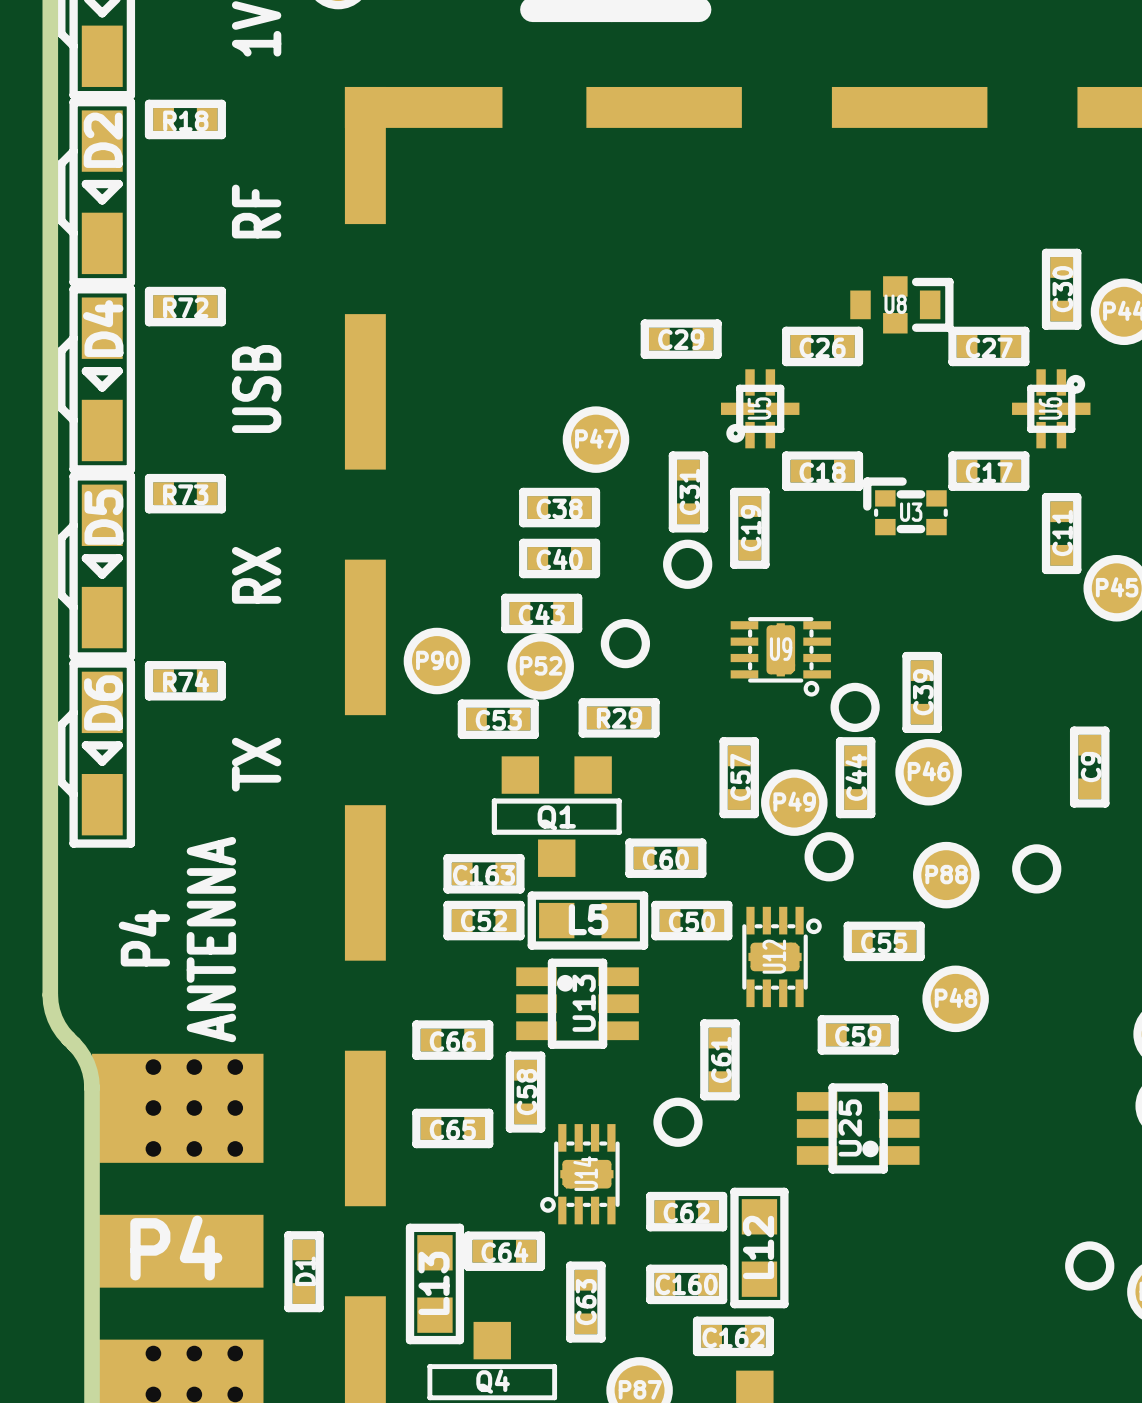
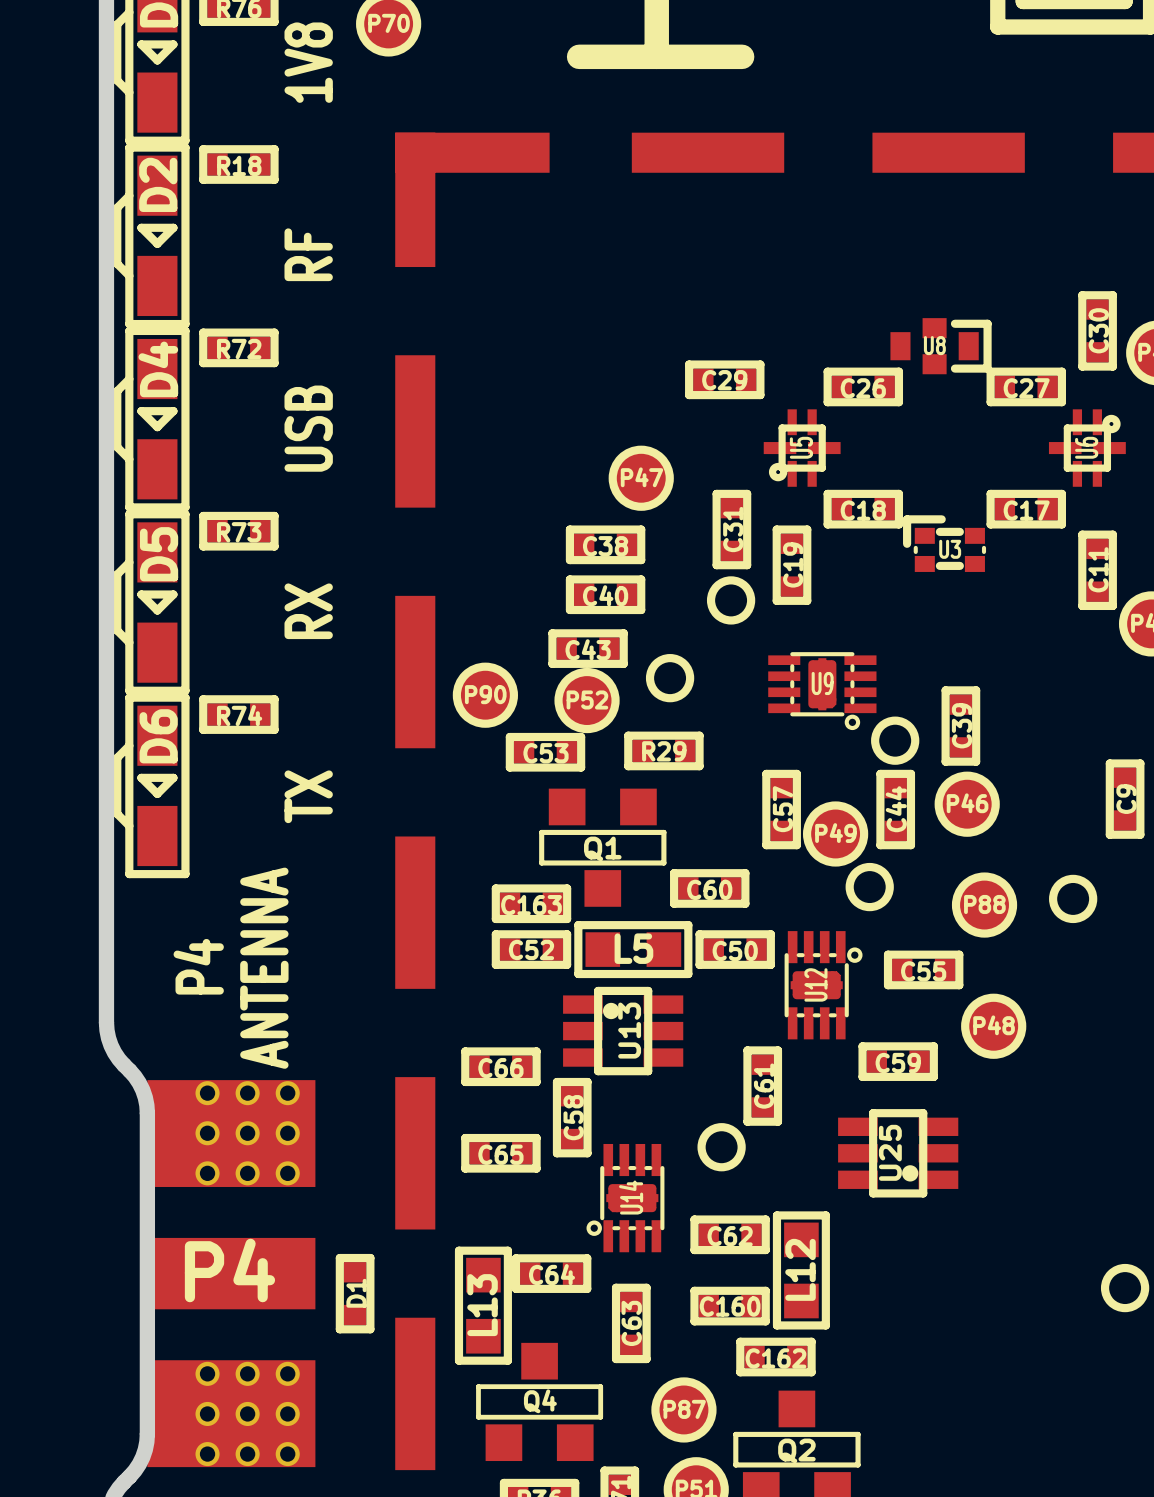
U9 footprint: [730, 617, 831, 697] -> [768, 652, 877, 731]
U12 footprint: [742, 906, 822, 1008] -> [784, 931, 863, 1040]
U14 footprint: [540, 1124, 620, 1225] -> [586, 1143, 665, 1253]

